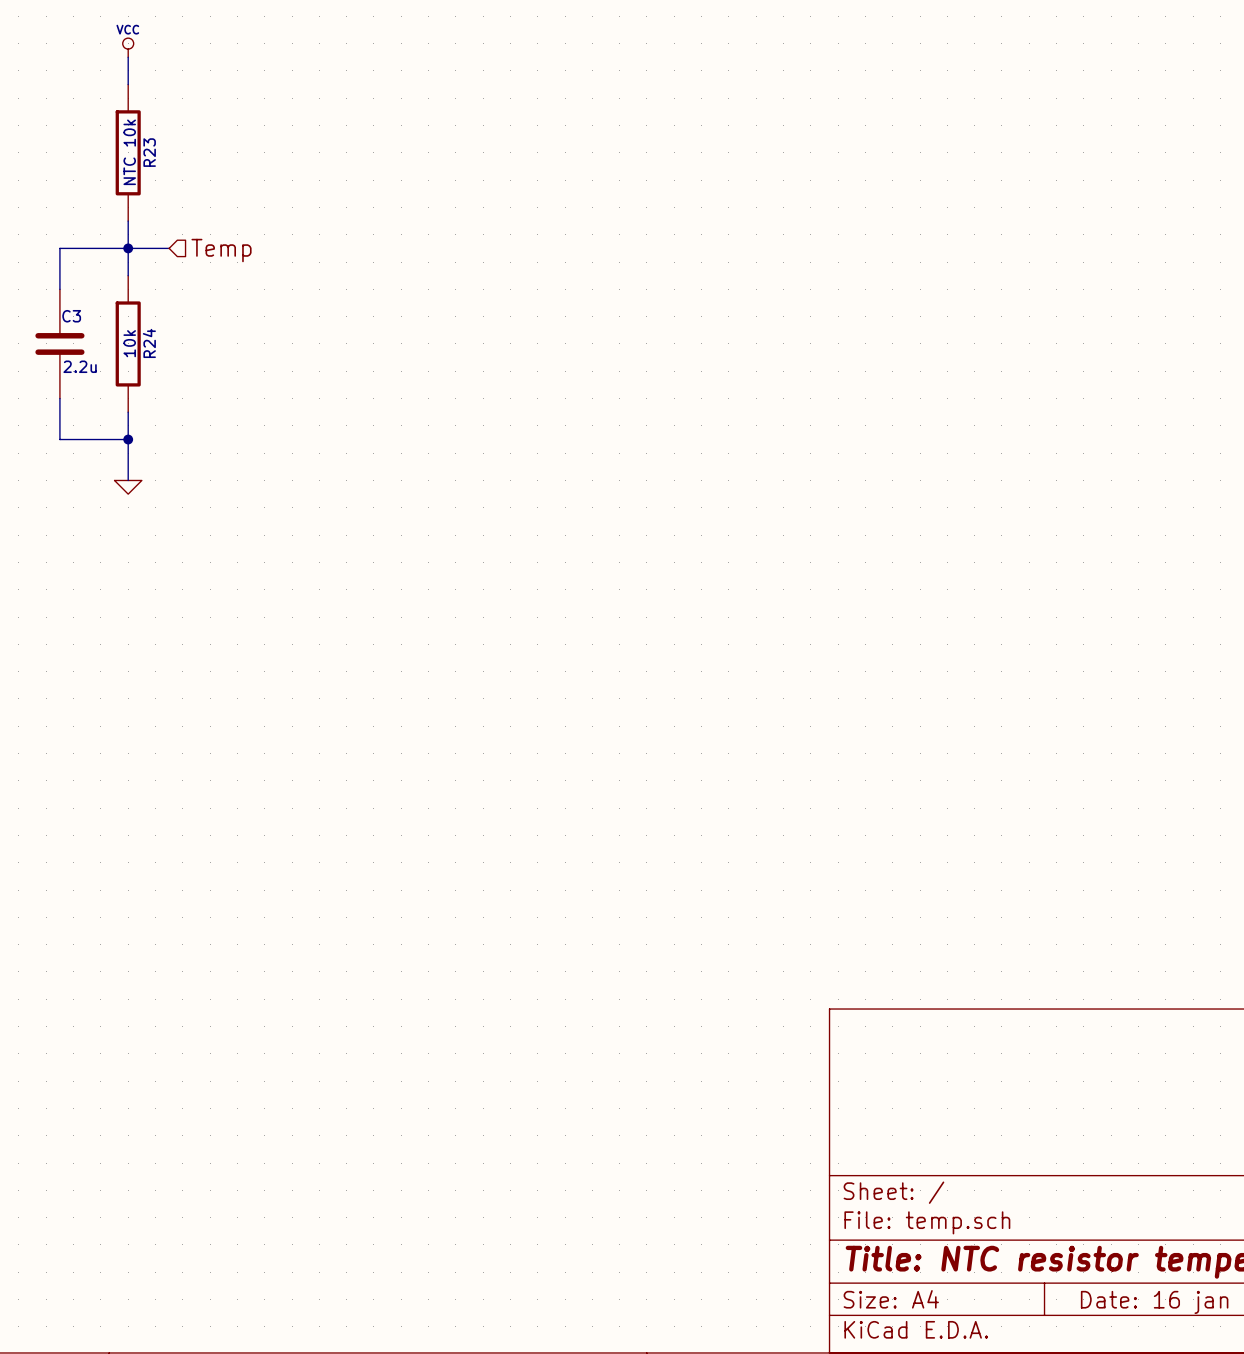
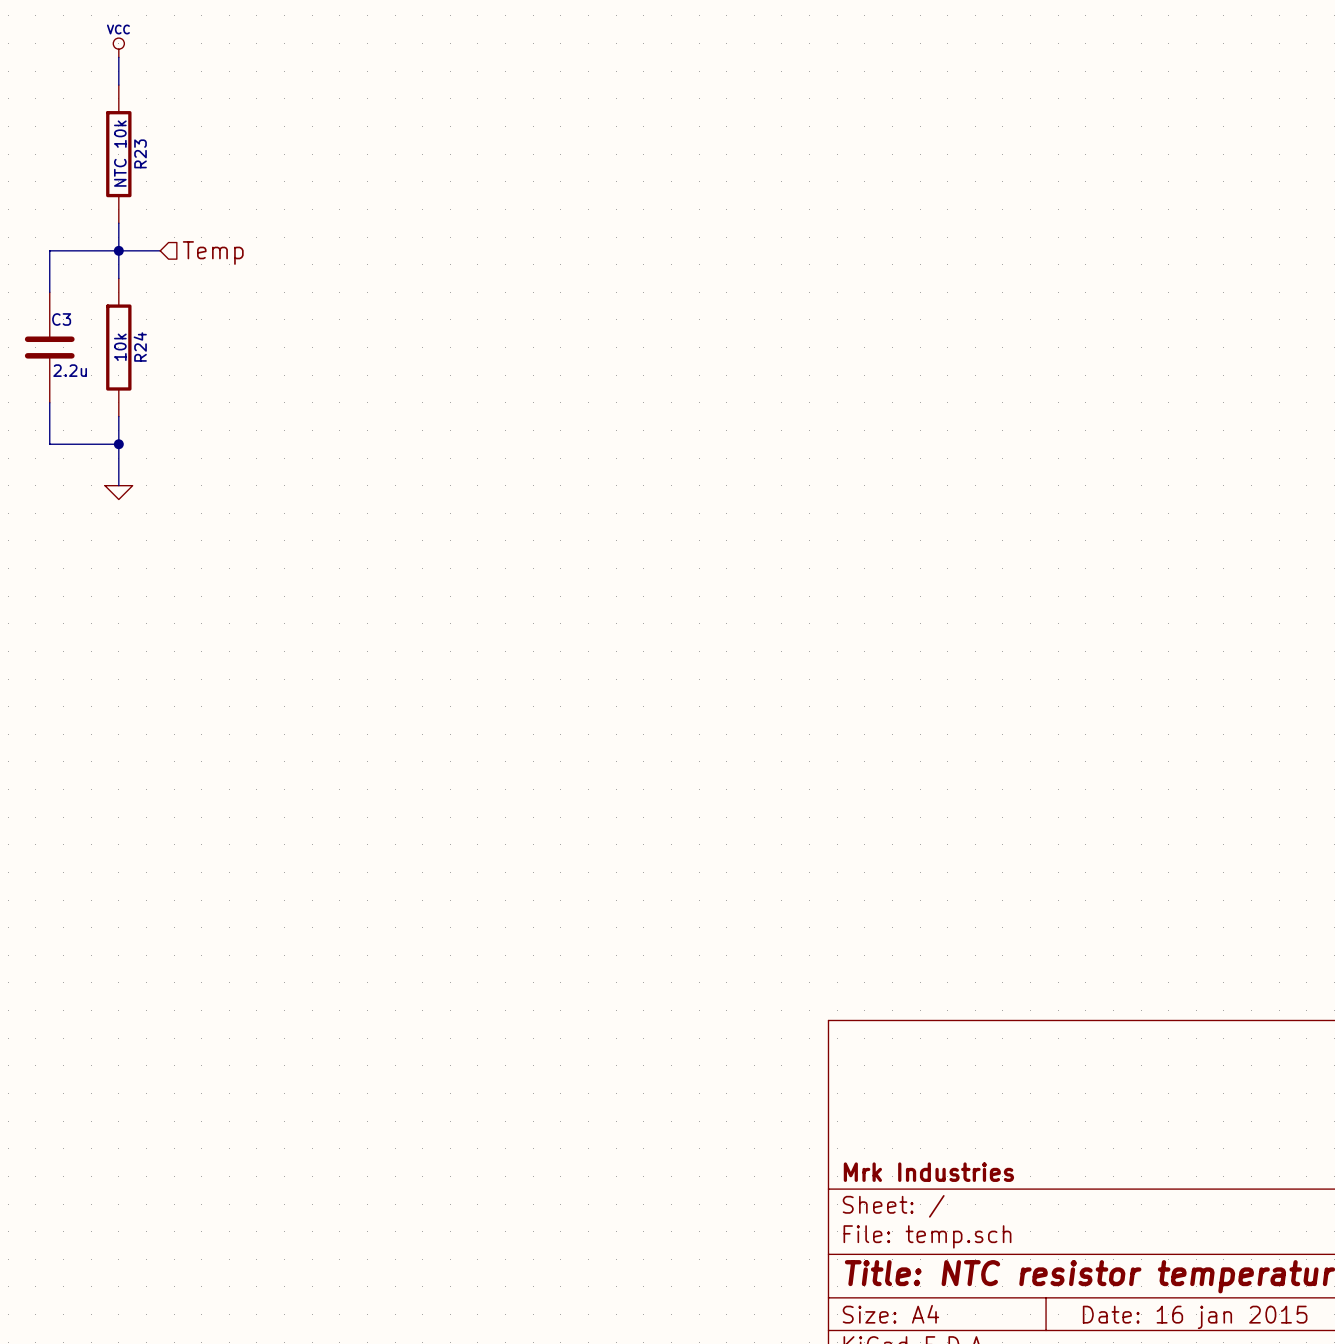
title block: none -> Mrk Industries (928, 1172)

